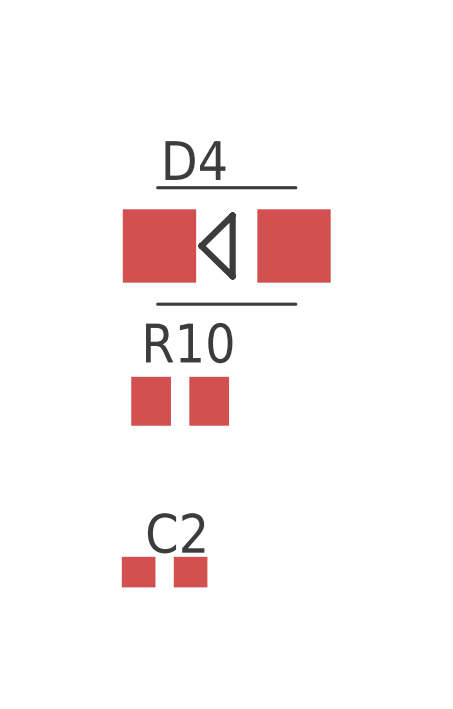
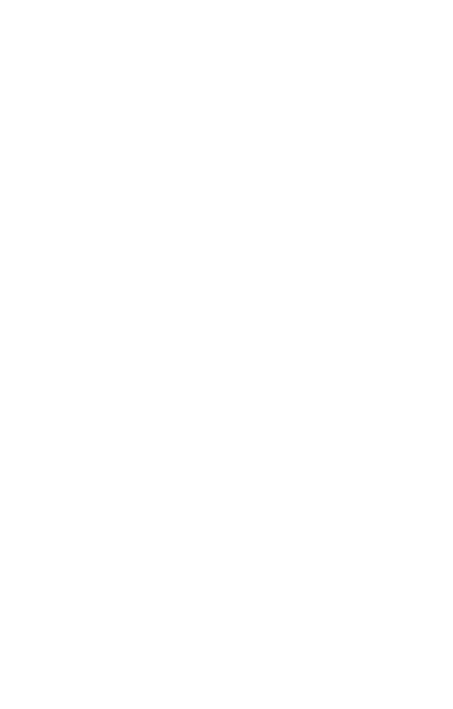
D4: (226, 245) -> none
R10: (180, 401) -> none
C2: (164, 572) -> none

